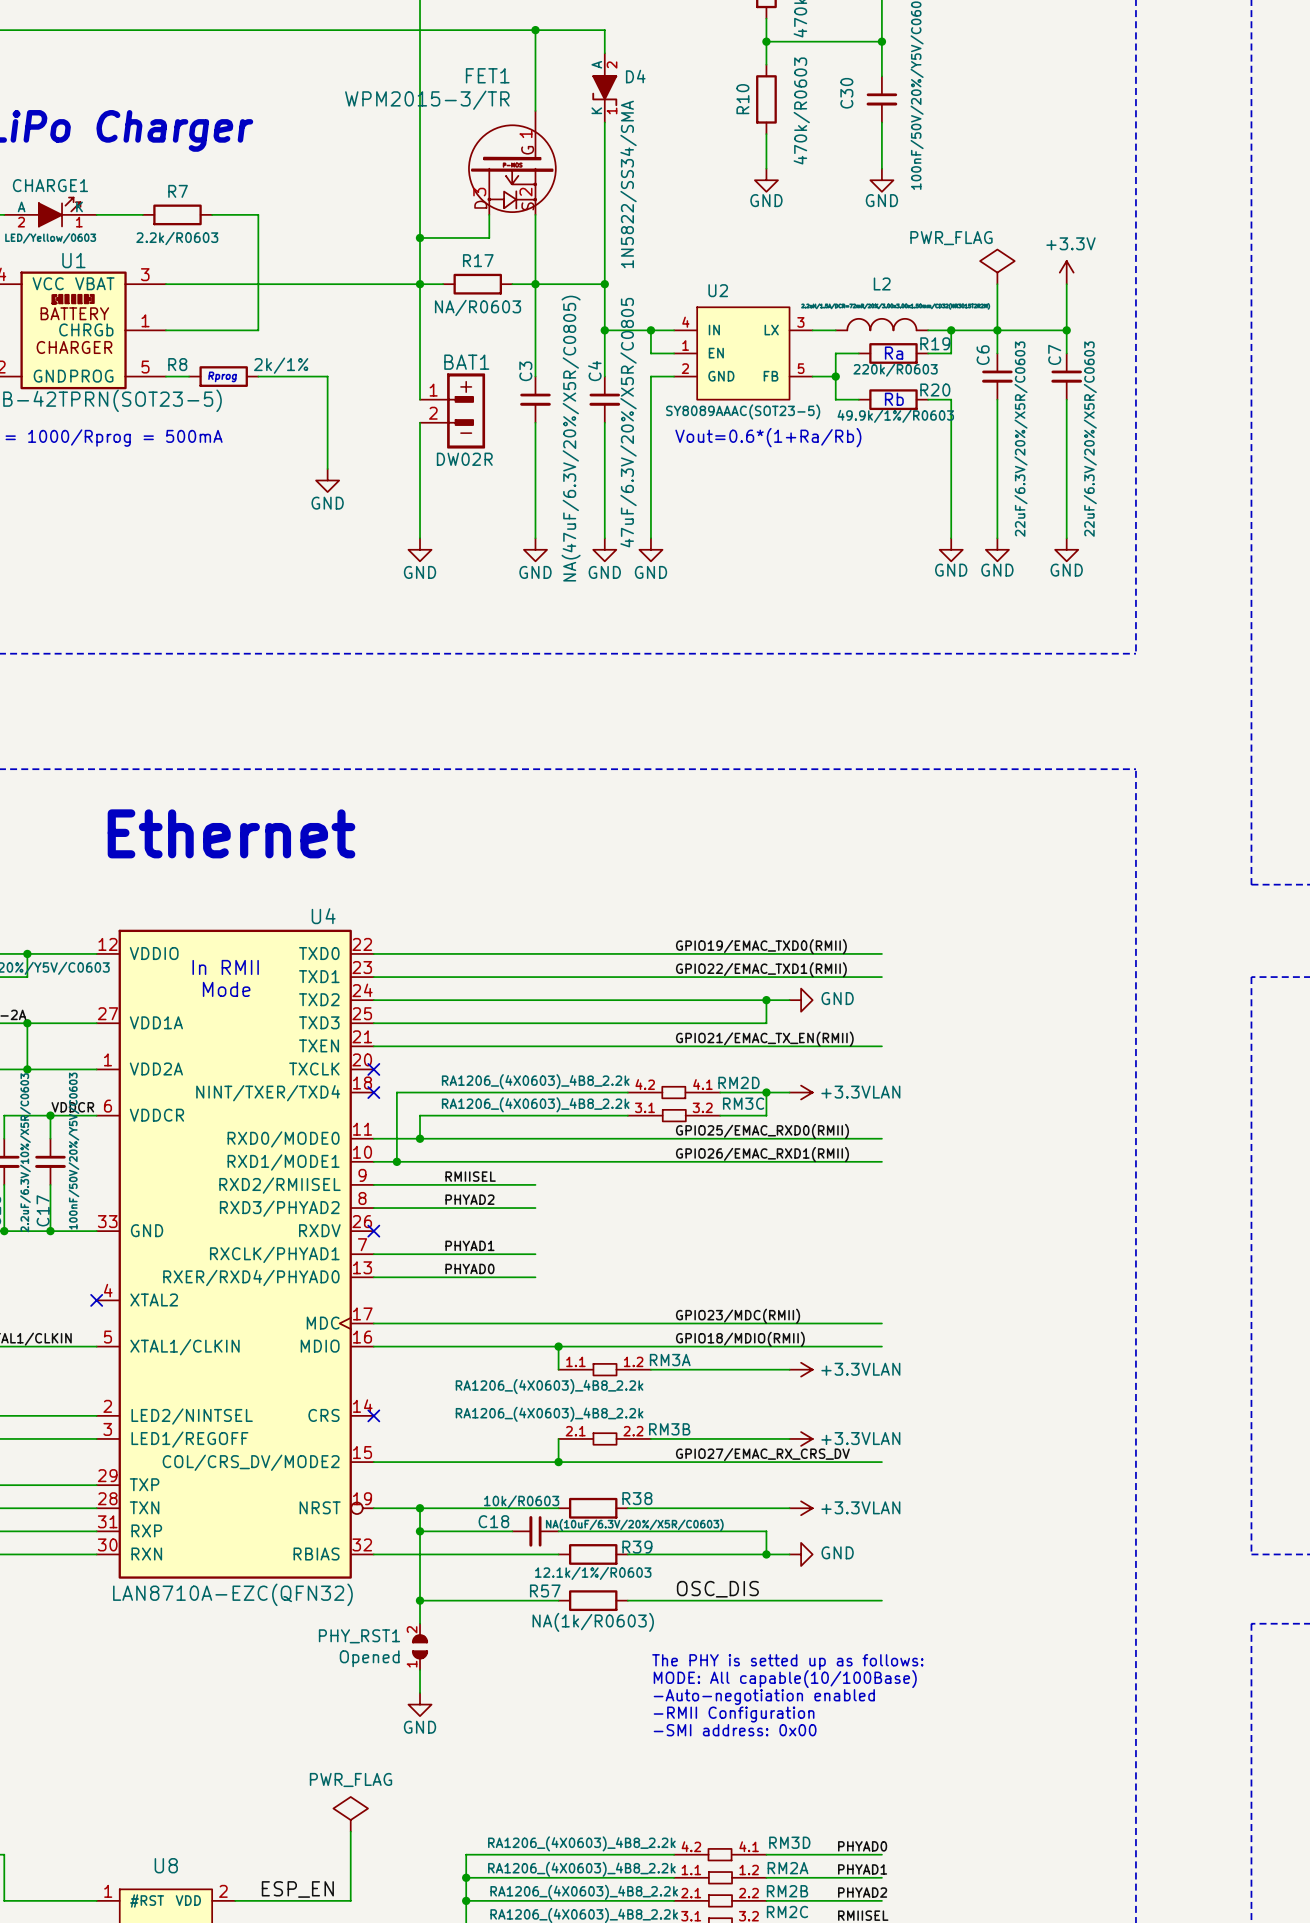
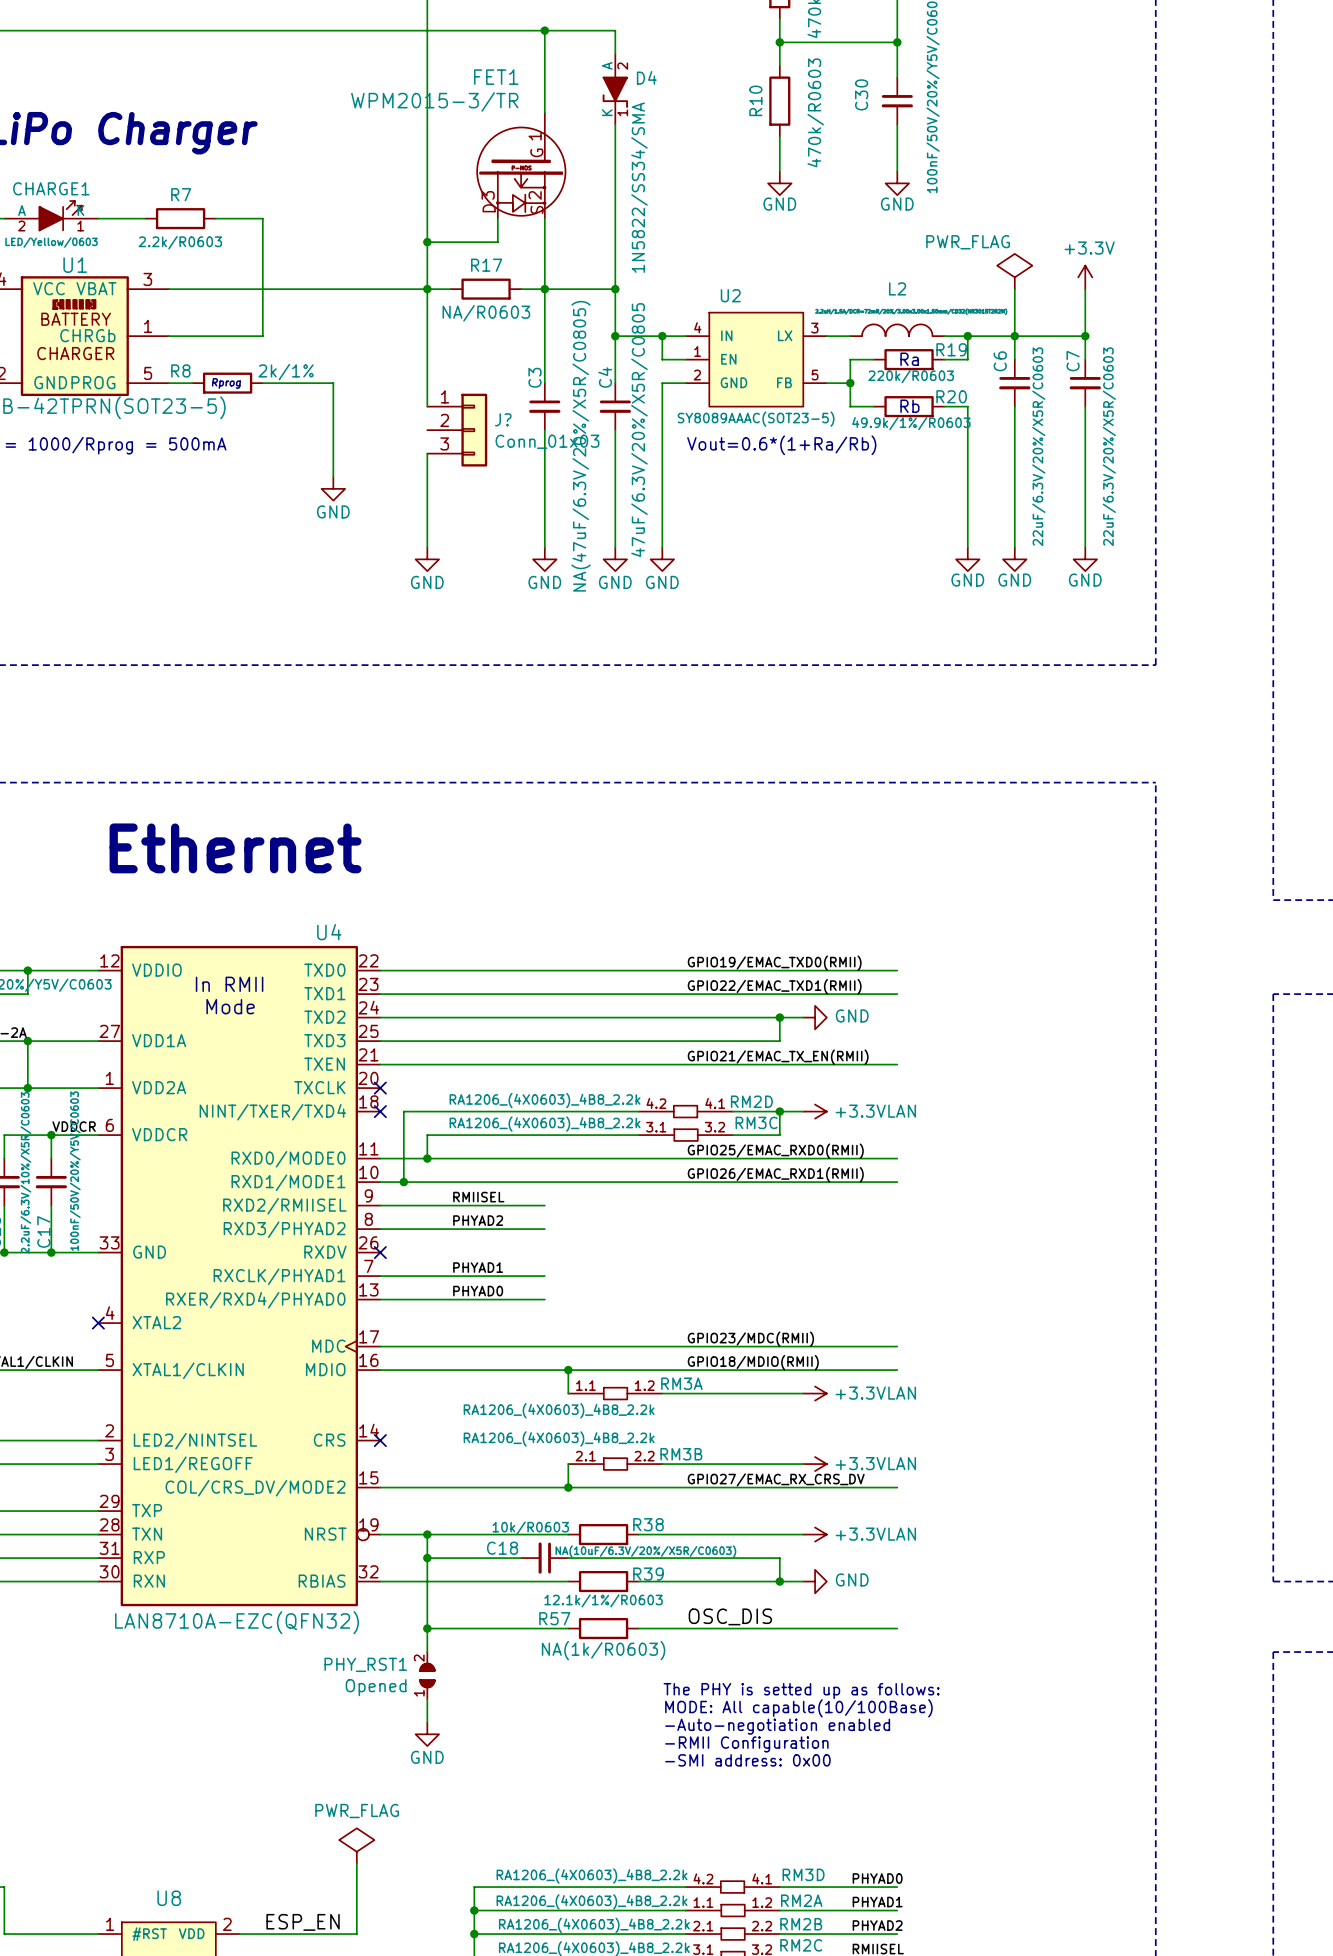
BAT1: DW02R (452, 410) -> none
wire: (420, 422) (420, 445) -> none
J?: none -> Conn_01x03 (457, 430)

